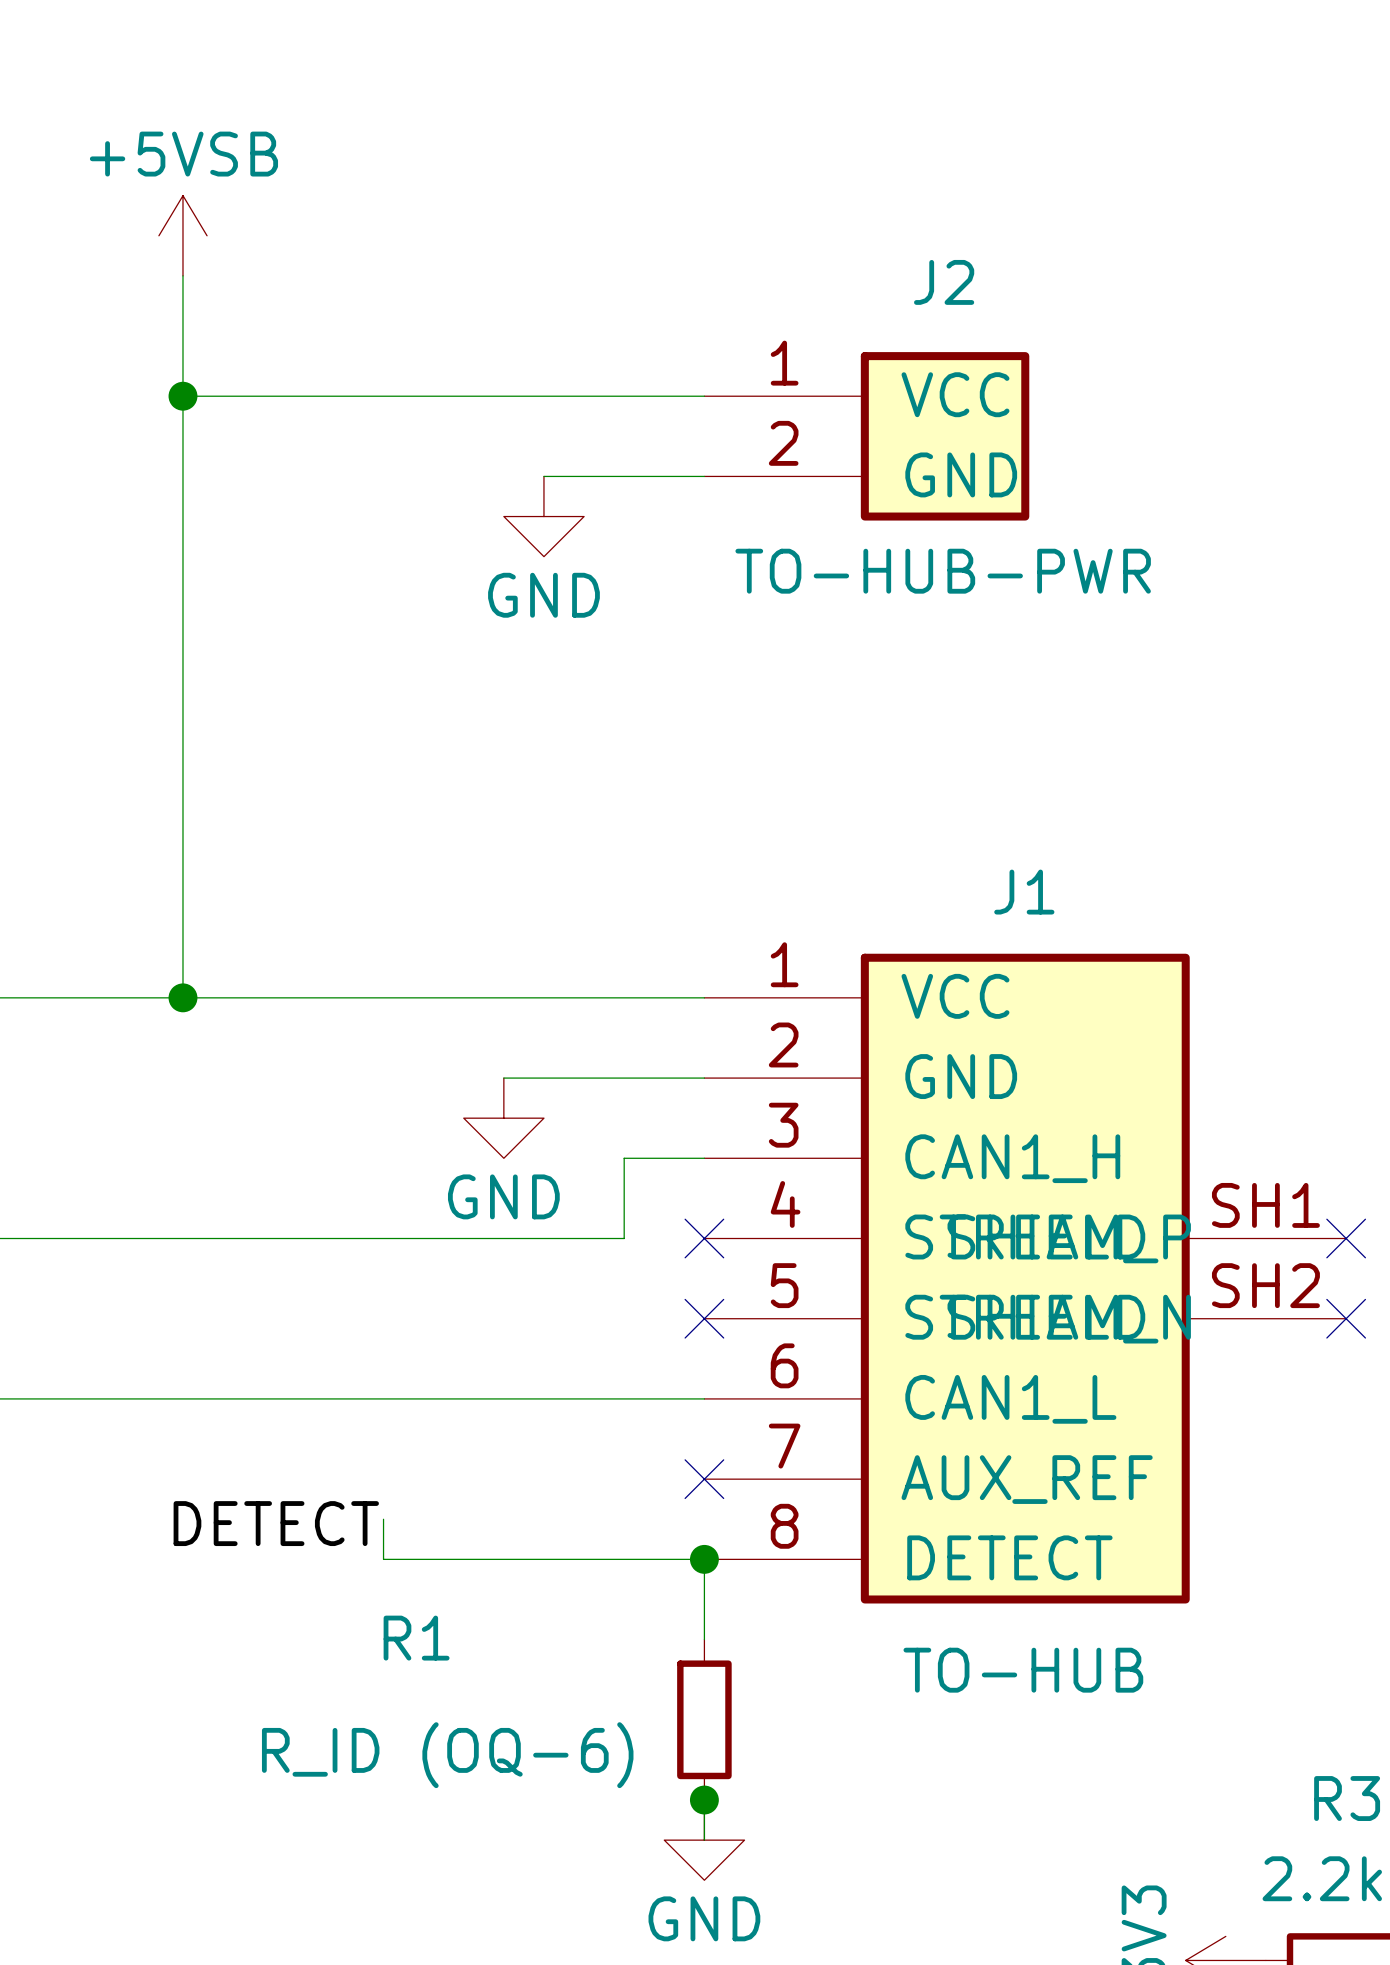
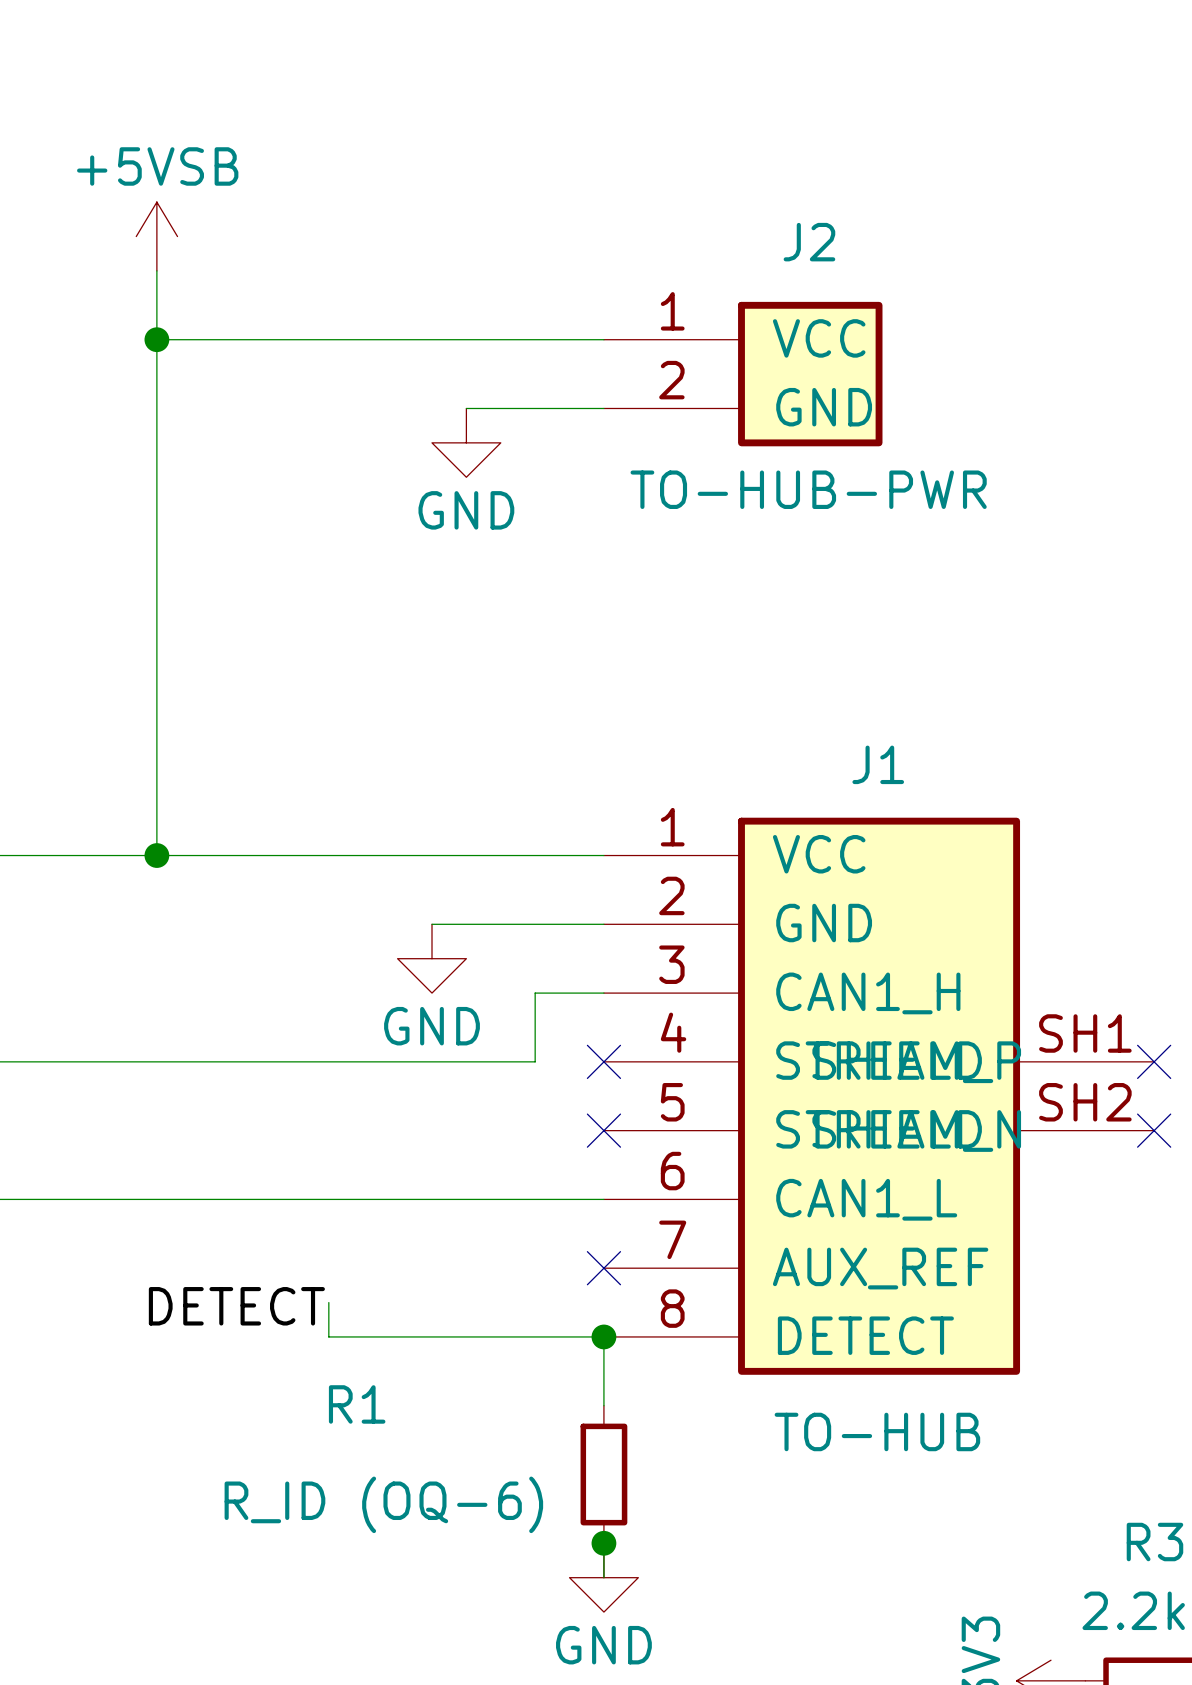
power symbol position: +5VSB (182, 235) -> +5VSB (156, 236)

